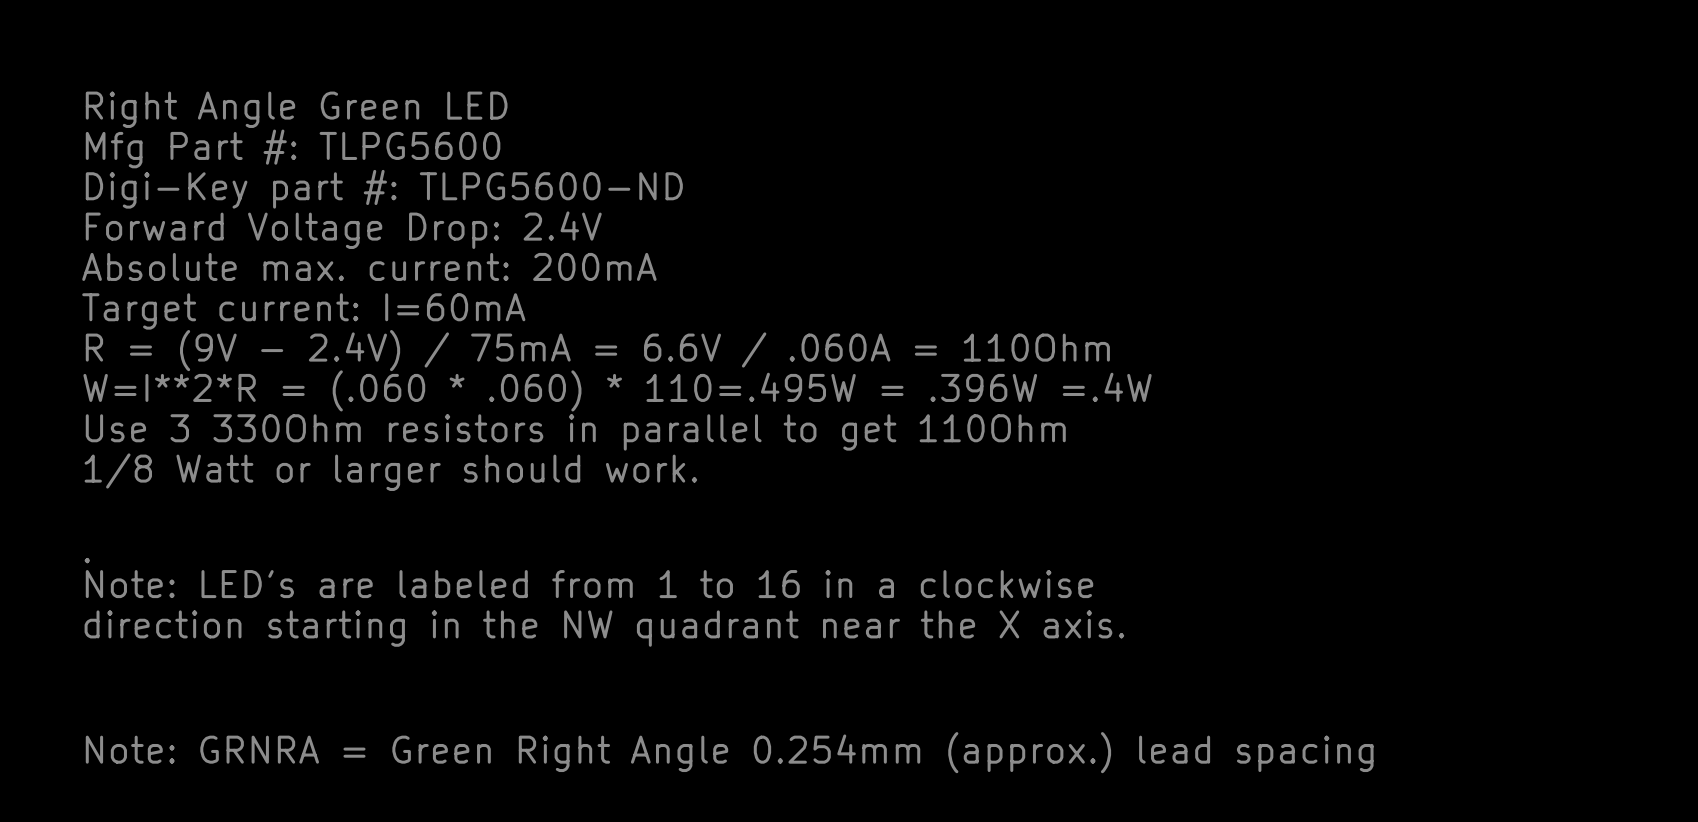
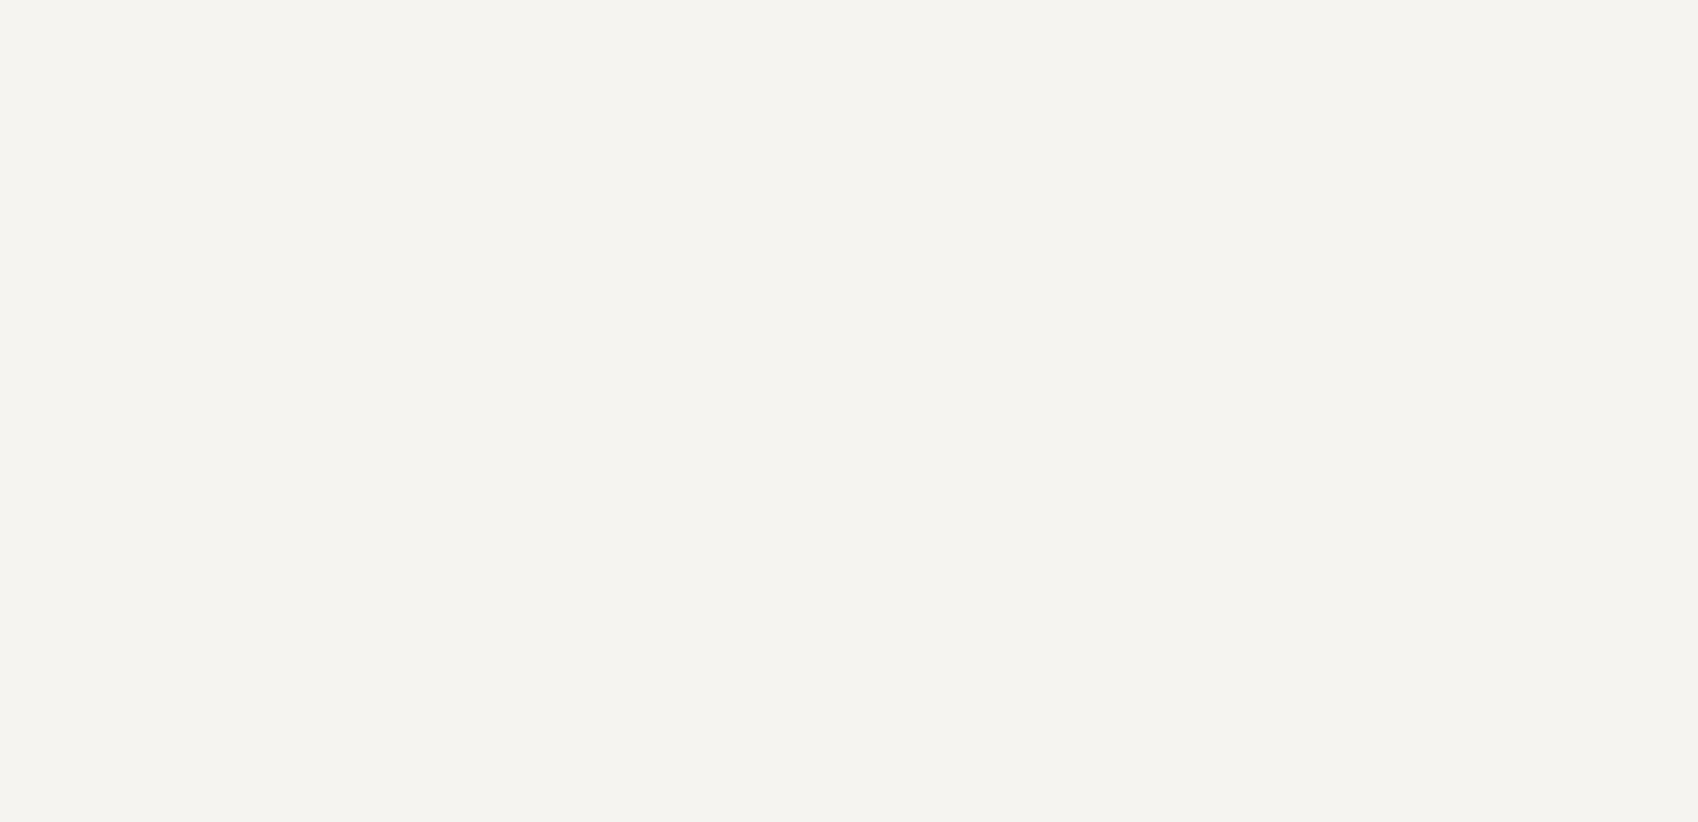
text: Right Angle Green LED (296, 109) -> none
text: Mfg Part #: TLPG5600 (293, 148) -> none
text: Digi-Key part #: TLPG5600-ND (384, 189) -> none
text: Forward Voltage Drop: 2.4V (343, 230) -> none
text: Absolute max. current: 200mA (369, 266) -> none
text: Target current: I=60mA (303, 311) -> none
text: R = (9V - 2.4V) / 75mA = 6.6V / .060A = 110Ohm (597, 350) -> none
text: W=I**2*R = (.060 * .060) * 110=.495W = .396W =.4W (617, 390) -> none
text: Use 3 330Ohm resistors in parallel to get 110Ohm (575, 432) -> none
text: 1/8 Watt or larger should work. (390, 472) -> none
text: . (87, 560) -> none
text: Note: LED's are labeled from 1 to 16 in a clockwise (589, 584) -> none
text: direction starting in the NW quadrant near the X axis. (604, 628) -> none
text: Note: GRNRA = Green Right Angle 0.254mm (approx.) lead spacing (729, 752) -> none

